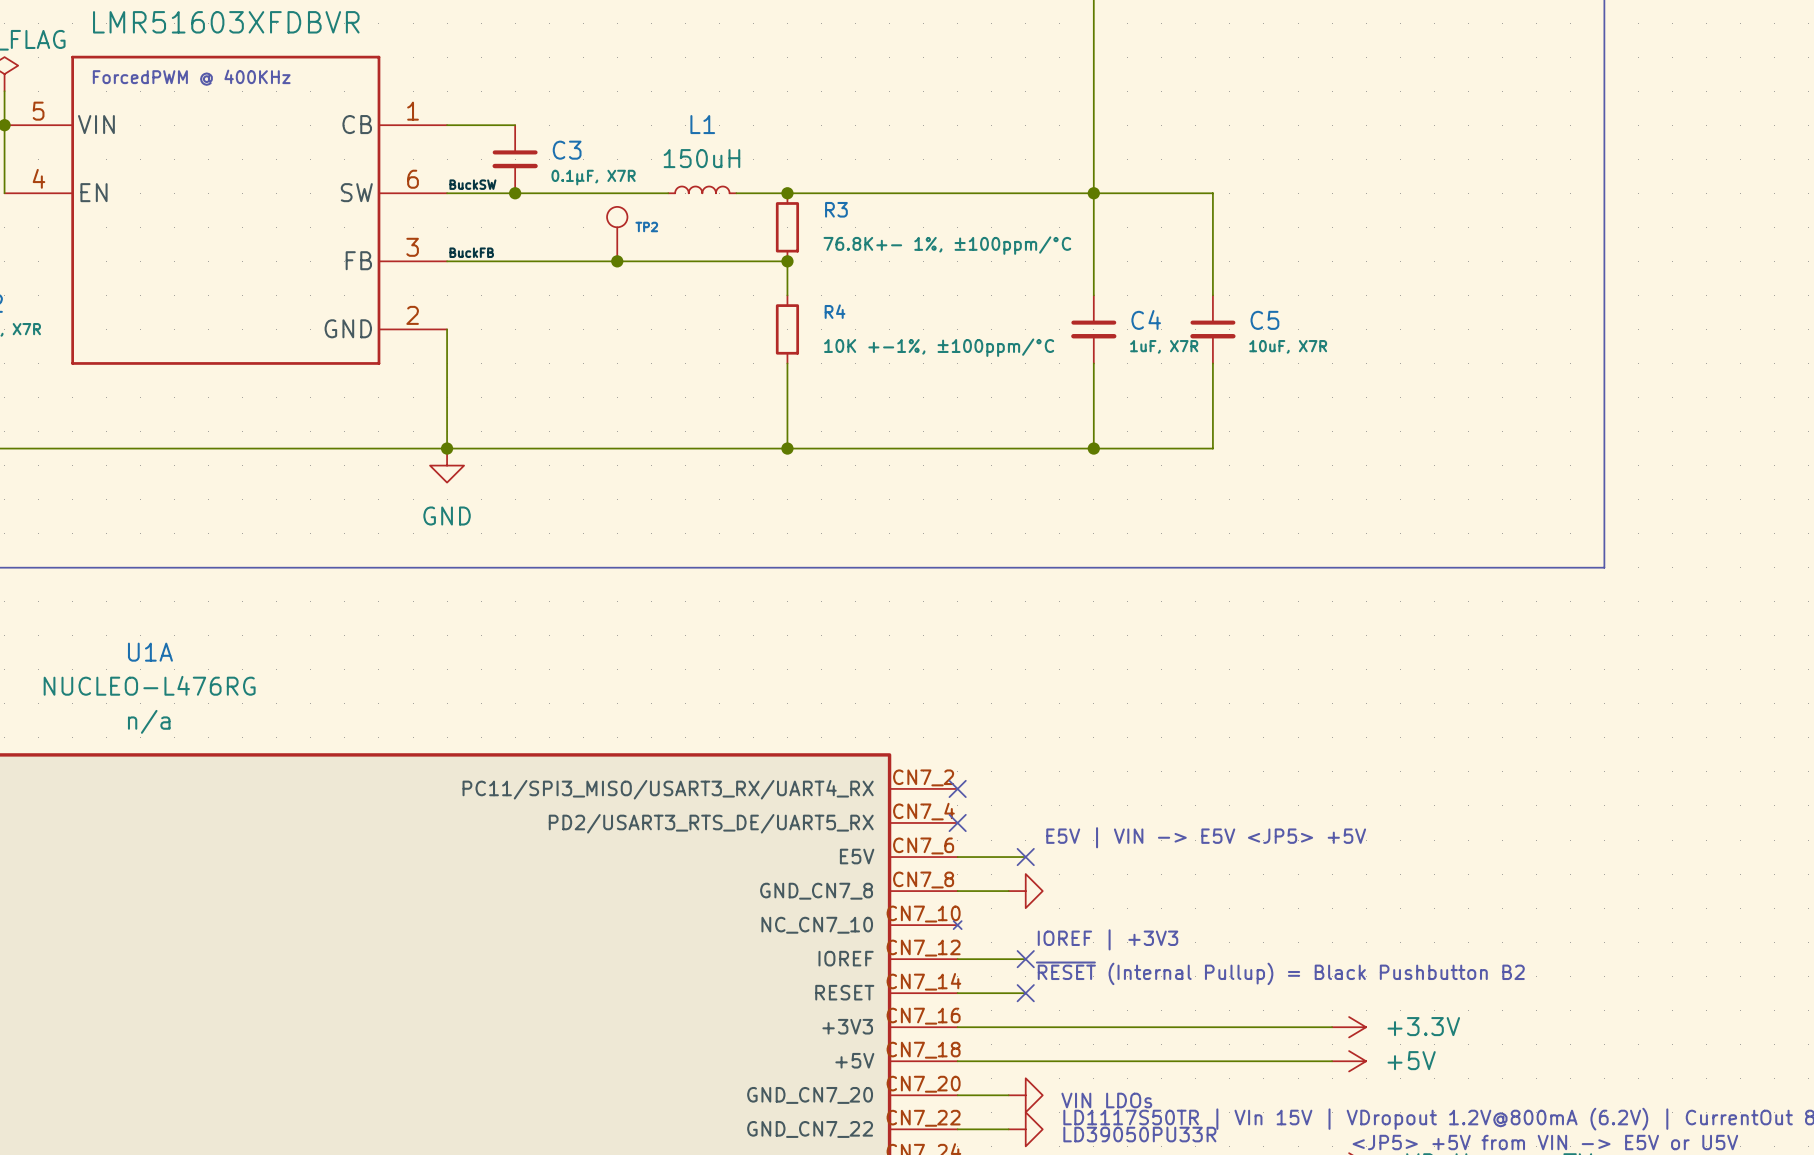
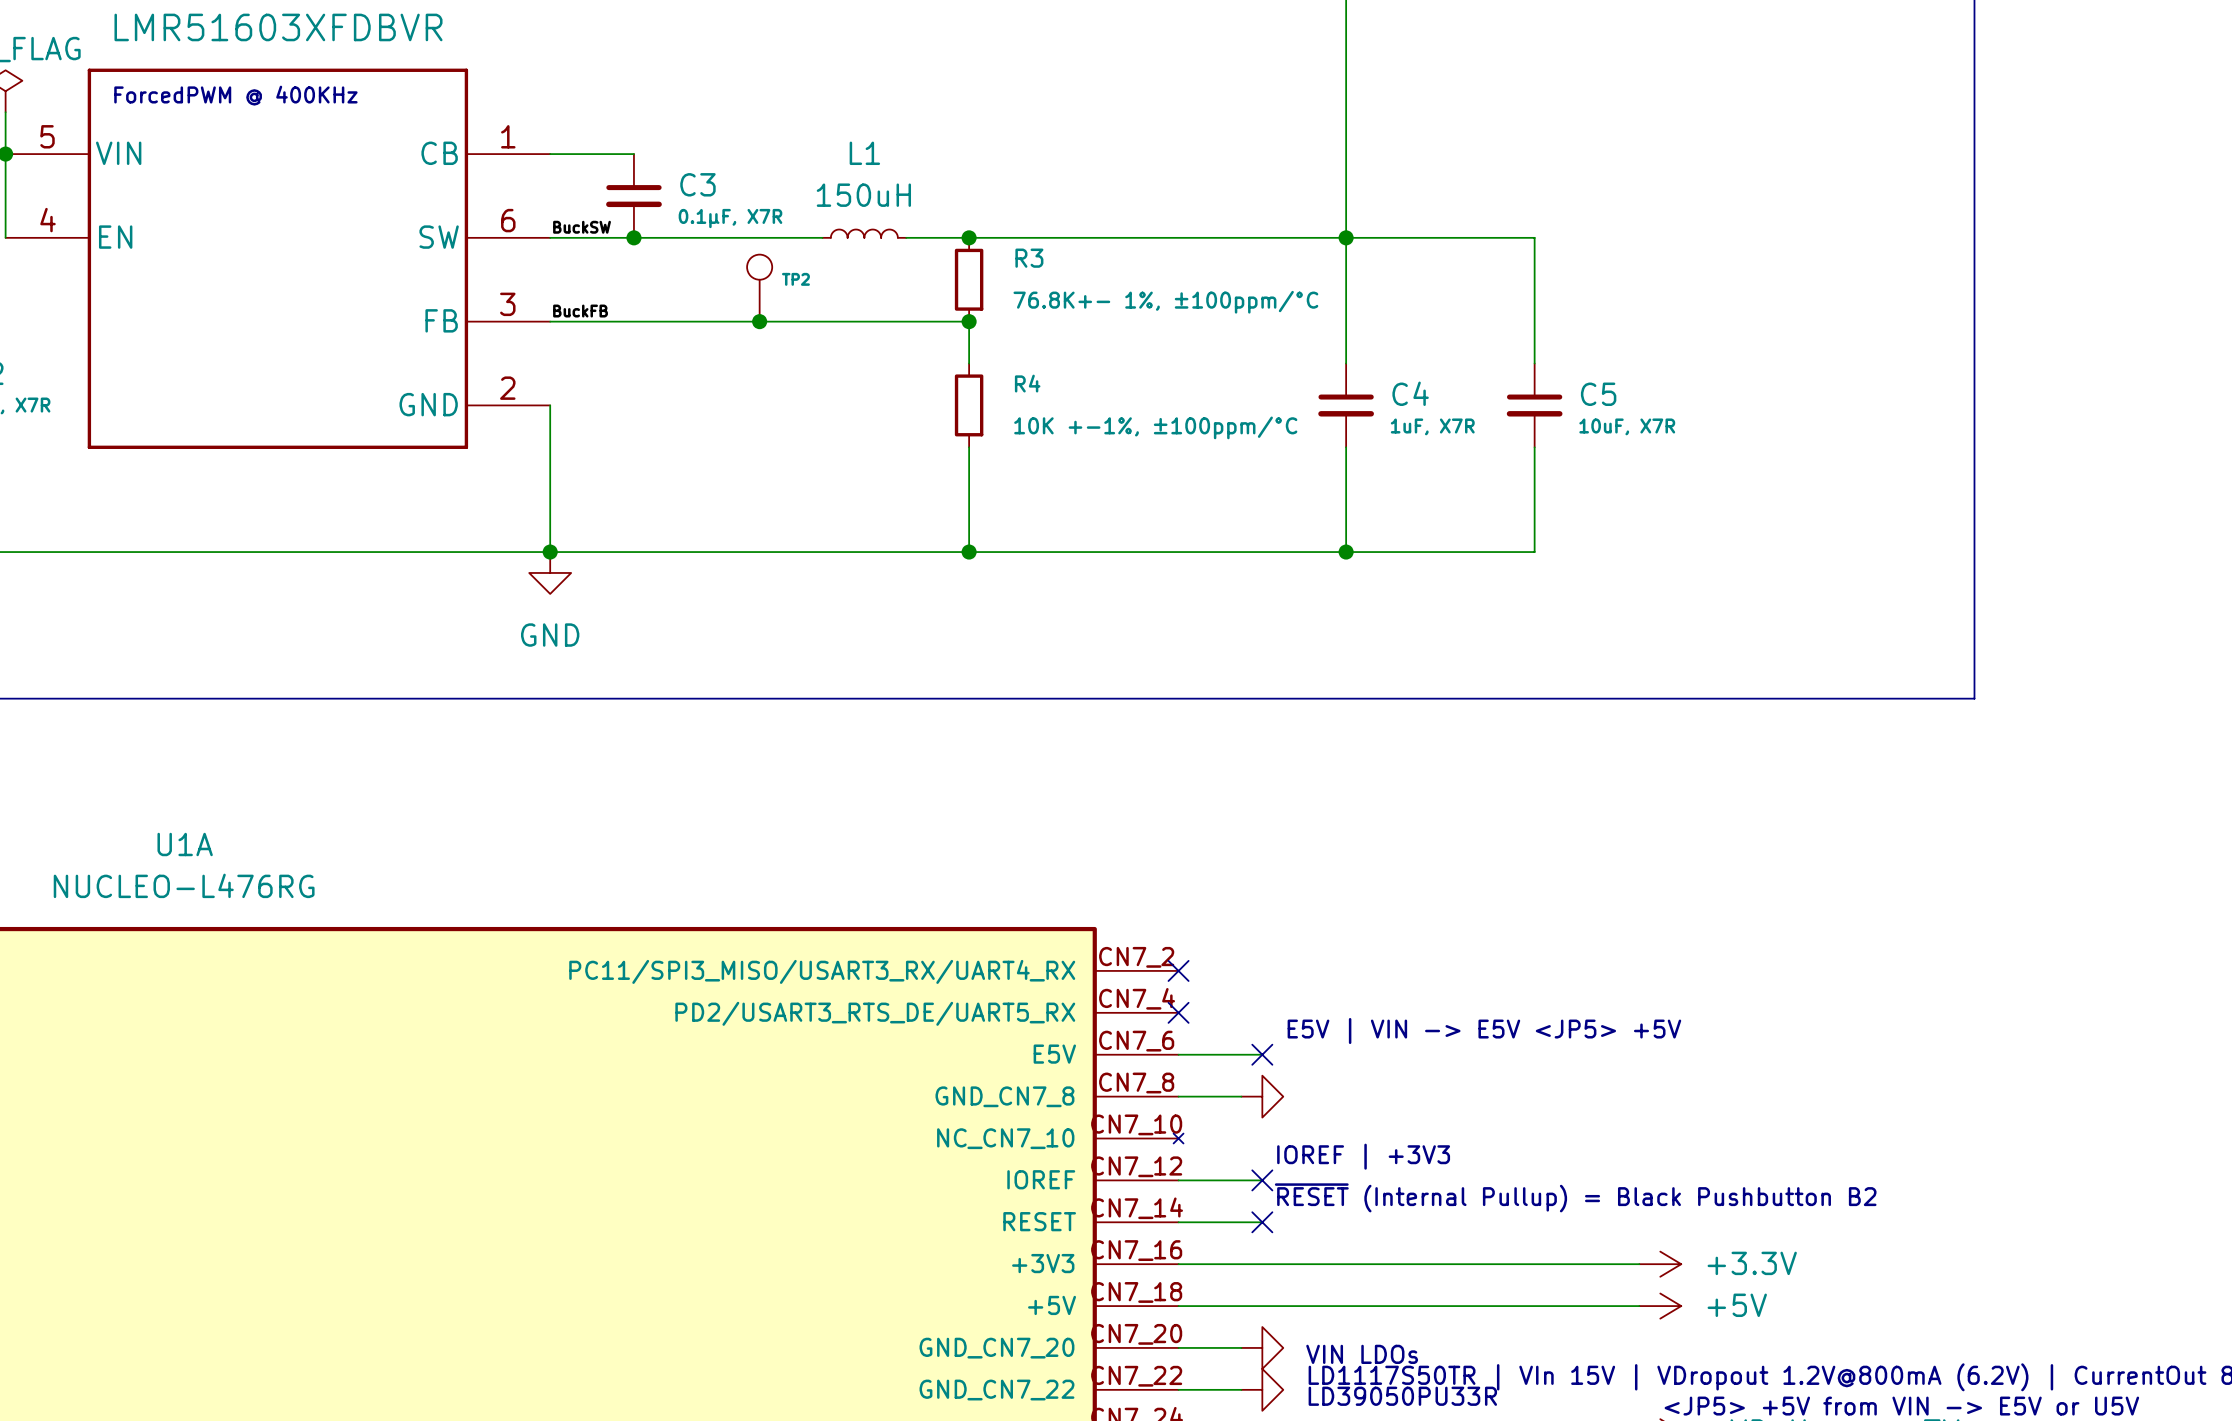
wire: (1212, 193) (1212, 295) -> (1492, 237) (1534, 237) (1534, 363)
C5 position: (1212, 329) -> (1534, 405)
wire: (1212, 363) (1212, 448) -> (1534, 447) (1534, 552) (1492, 552)
U1A name position: U1A (150, 652) -> U1A (185, 844)
U1A value position: NUCLEO-L476RG (149, 685) -> NUCLEO-L476RG (184, 885)
U1A text: n/a (149, 721) -> none

